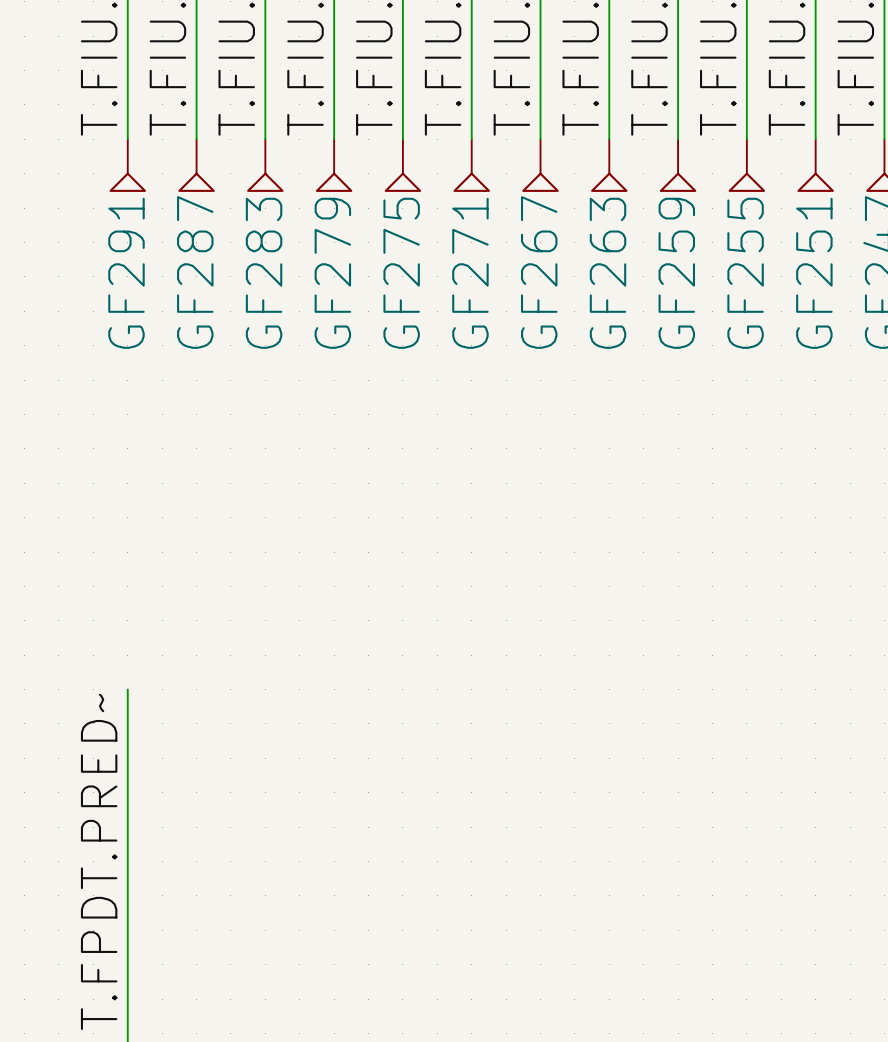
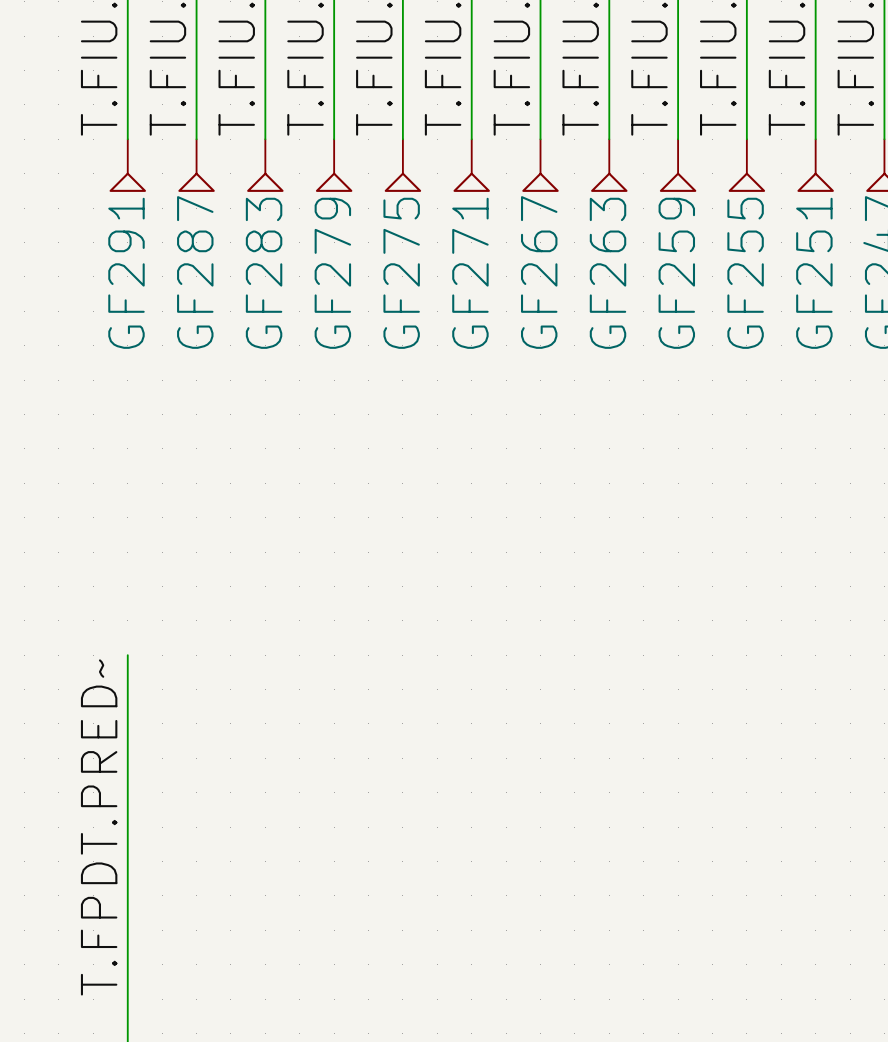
wire: none -> (127, 655) (127, 689)
label position: T.FPDT.PRED~ (99, 861) -> T.FPDT.PRED~ (99, 827)

